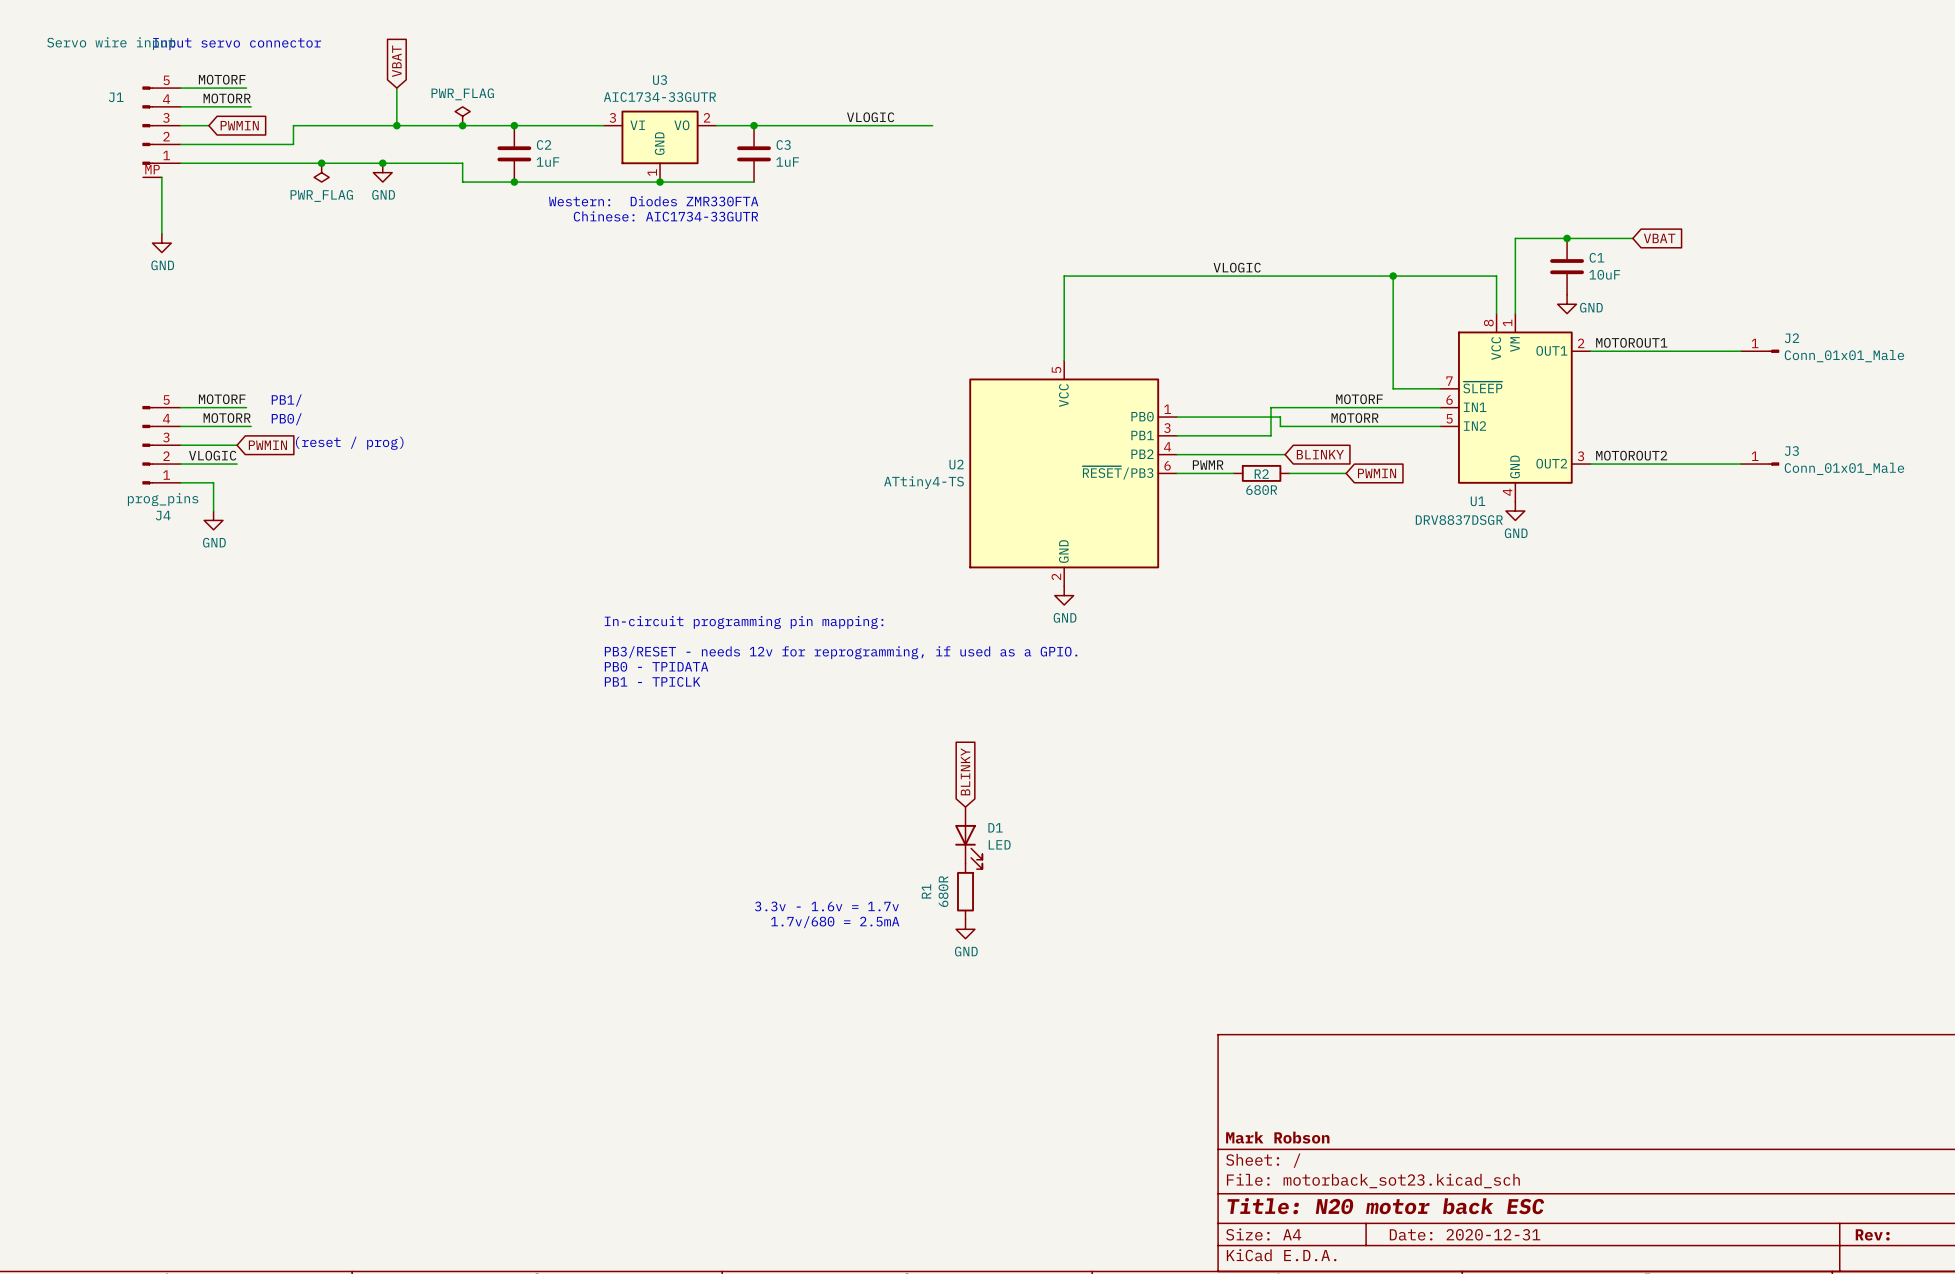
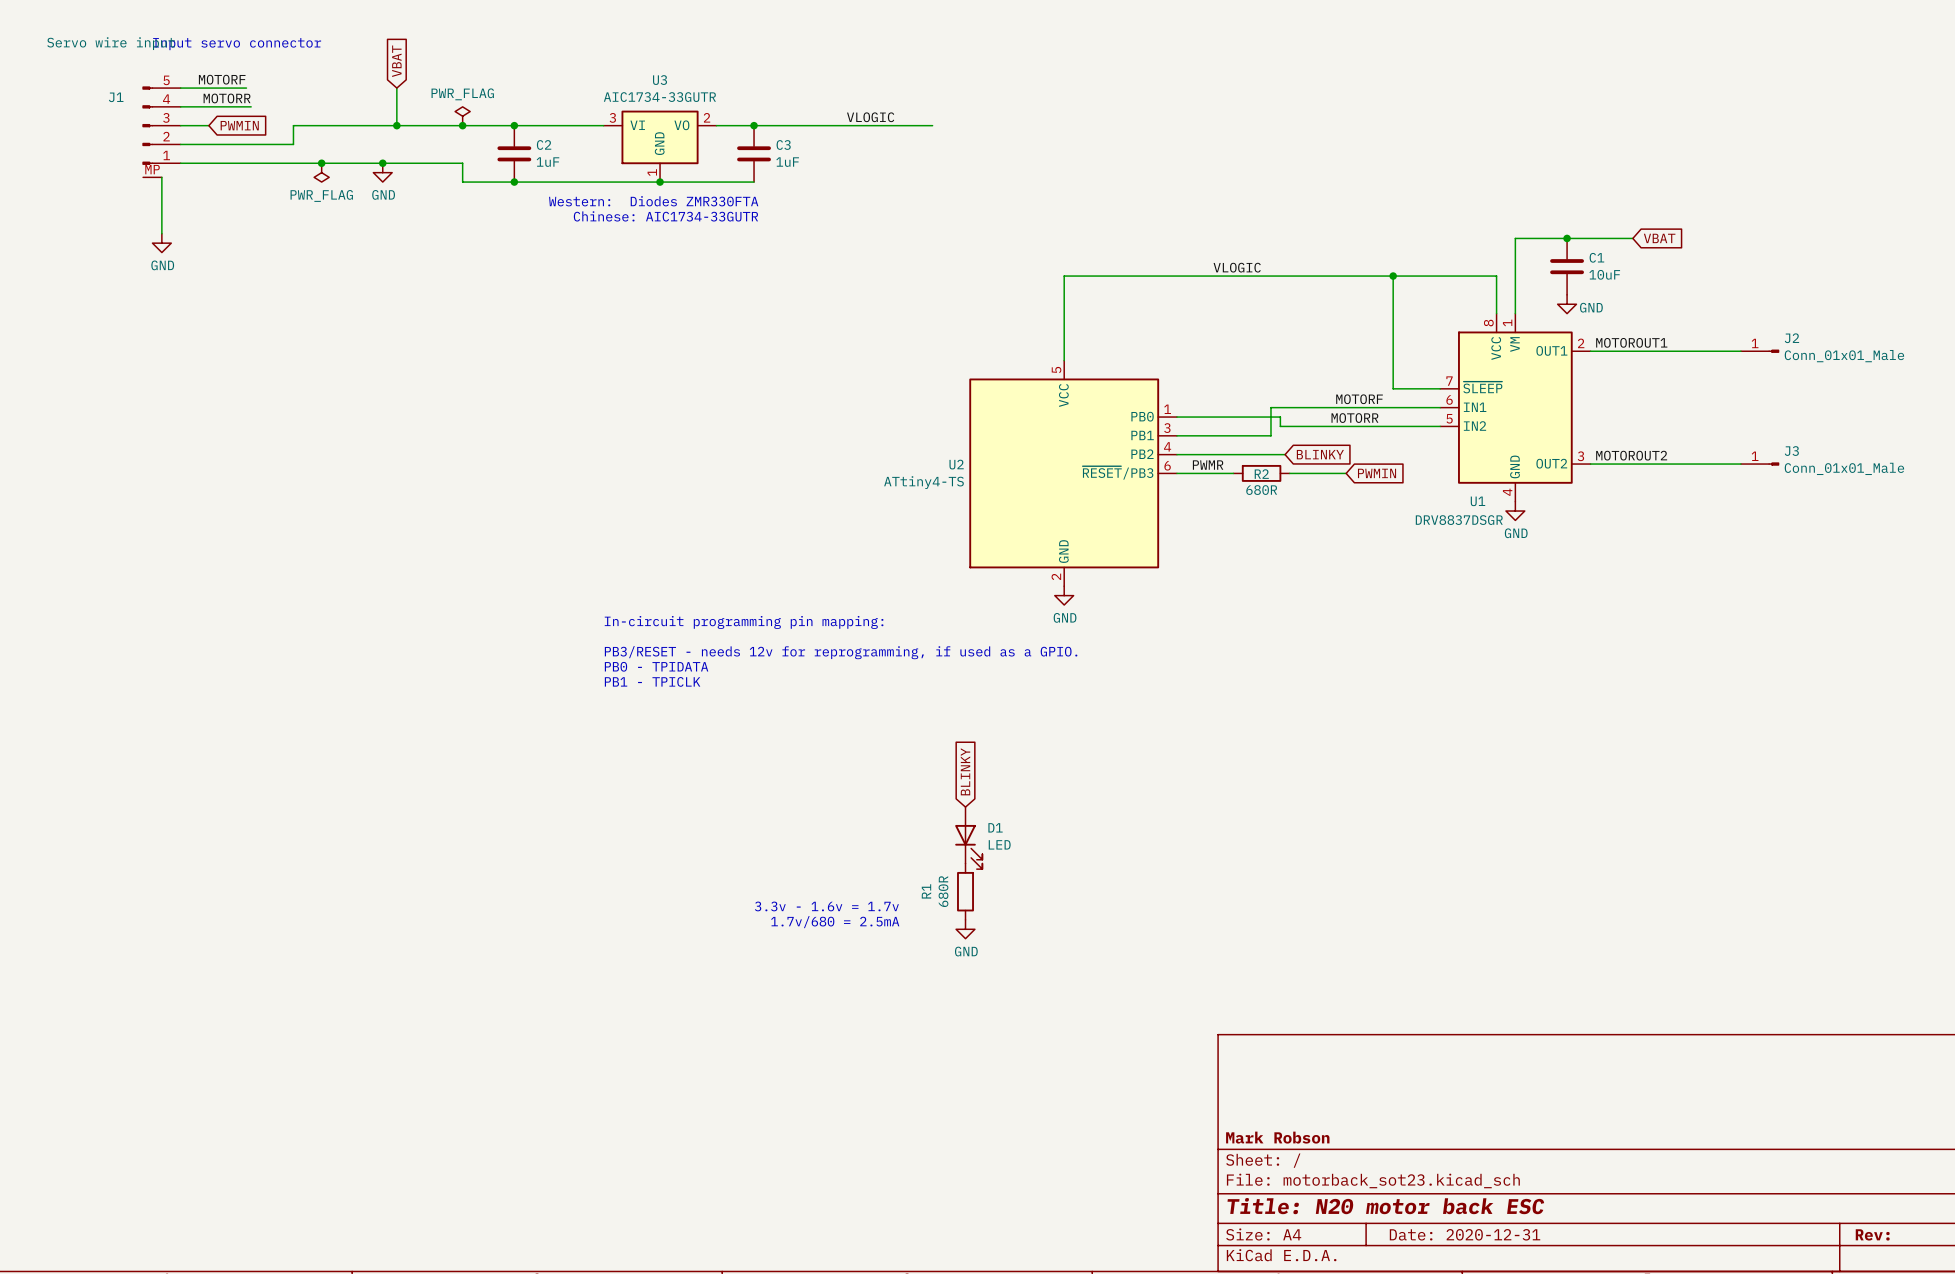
label: MOTORF (222, 399) -> none
text: PB1/ (286, 400) -> none
wire: (180, 407) (246, 407) -> none
label: MOTORR (227, 418) -> none
text: PB0/ (286, 419) -> none
wire: (180, 426) (251, 426) -> none
text: (reset / prog) (349, 443) -> none
J4: prog_pins (161, 445) -> none
wire: (180, 445) (237, 445) -> none
global label: PWMIN (267, 445) -> none
label: VLOGIC (212, 455) -> none
wire: (180, 464) (237, 464) -> none
wire: (180, 482) (213, 482) (213, 511) -> none
power symbol: GND (213, 520) -> none

